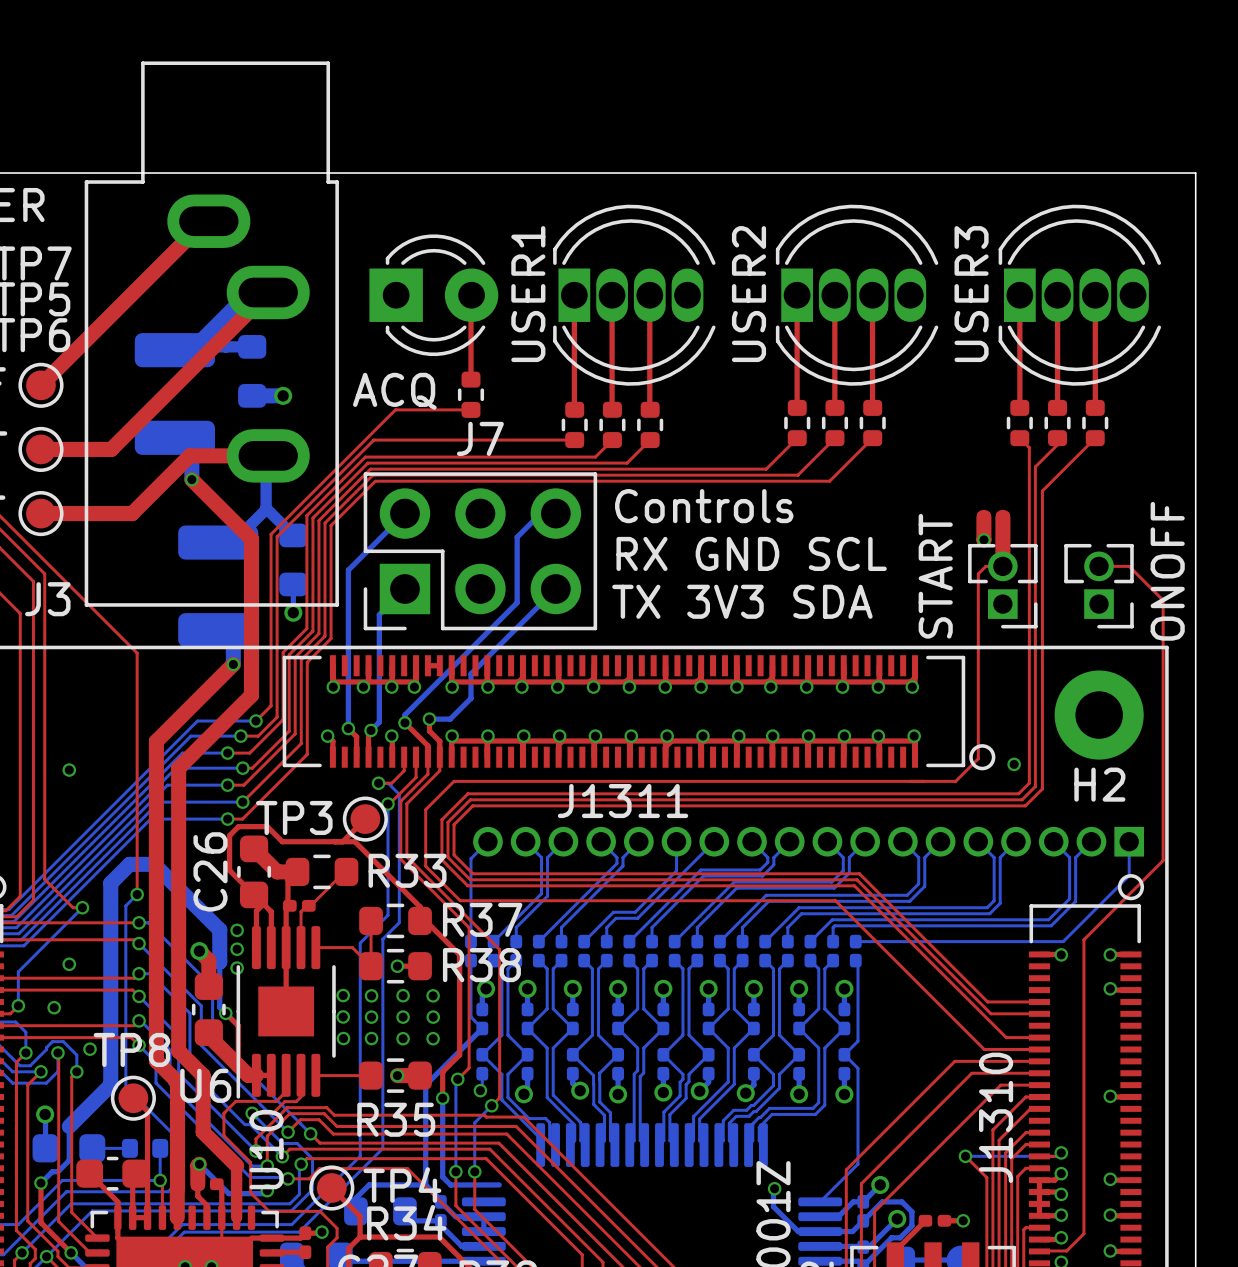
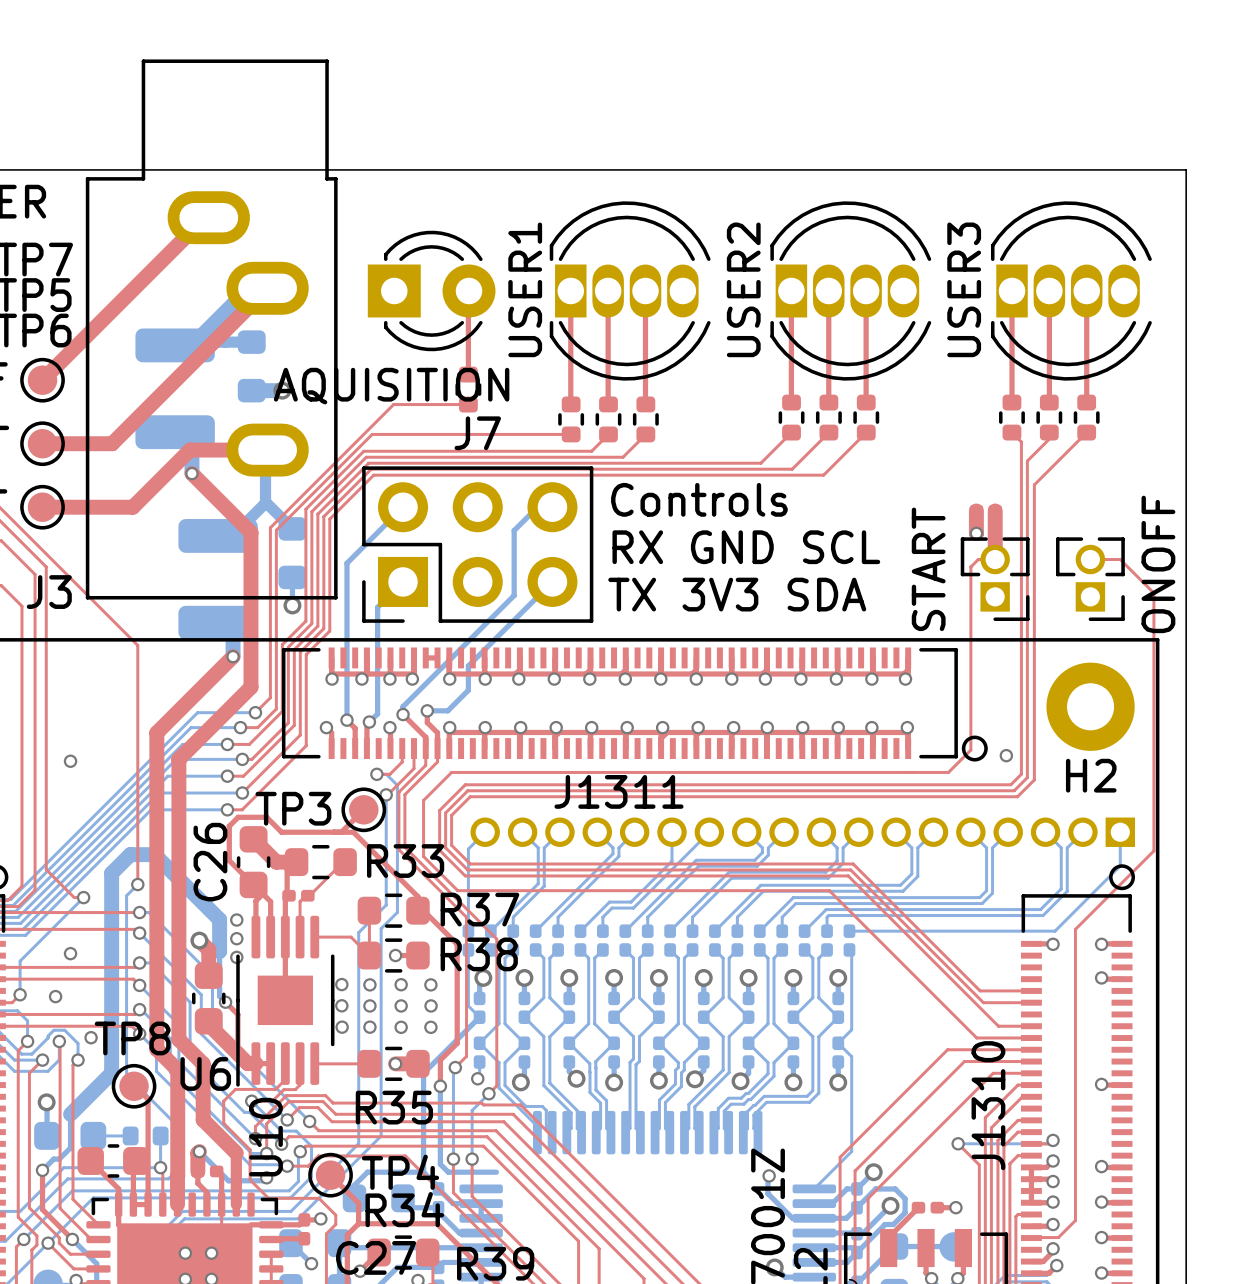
part value: ACQ (394, 391) -> AQUISITION (391, 386)

